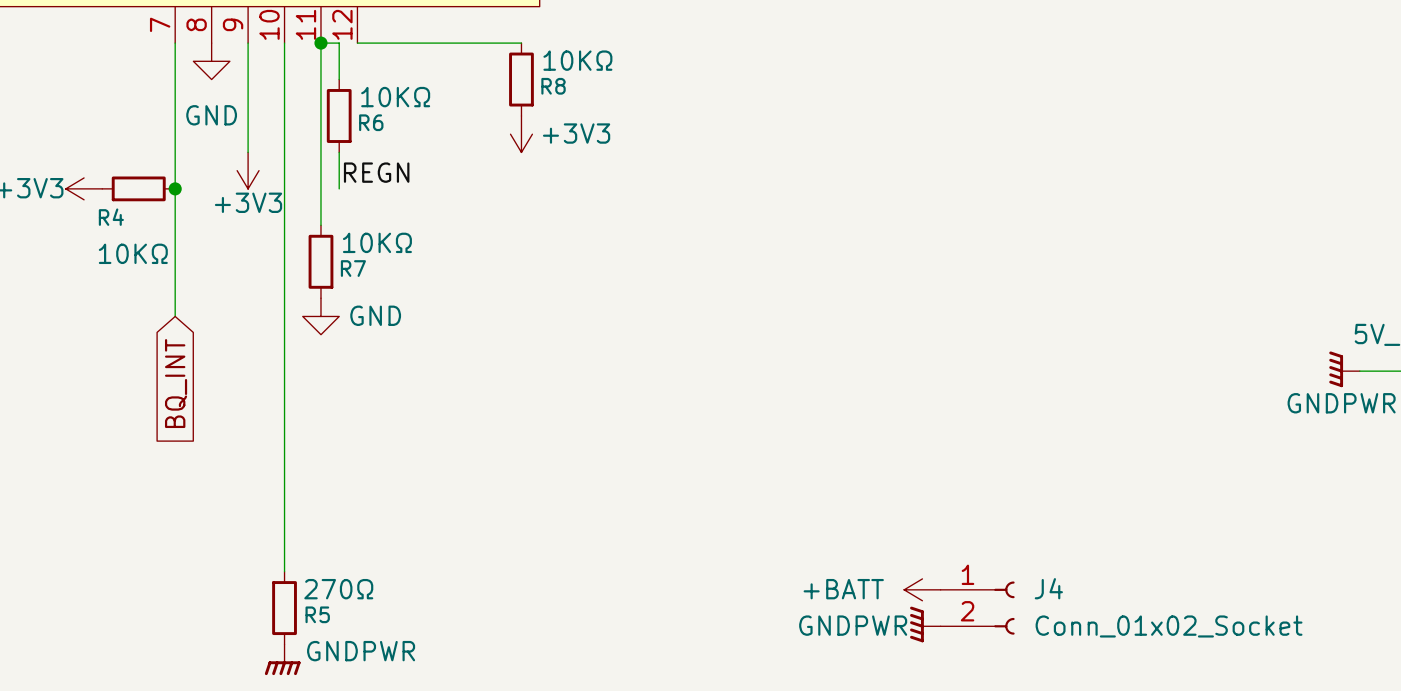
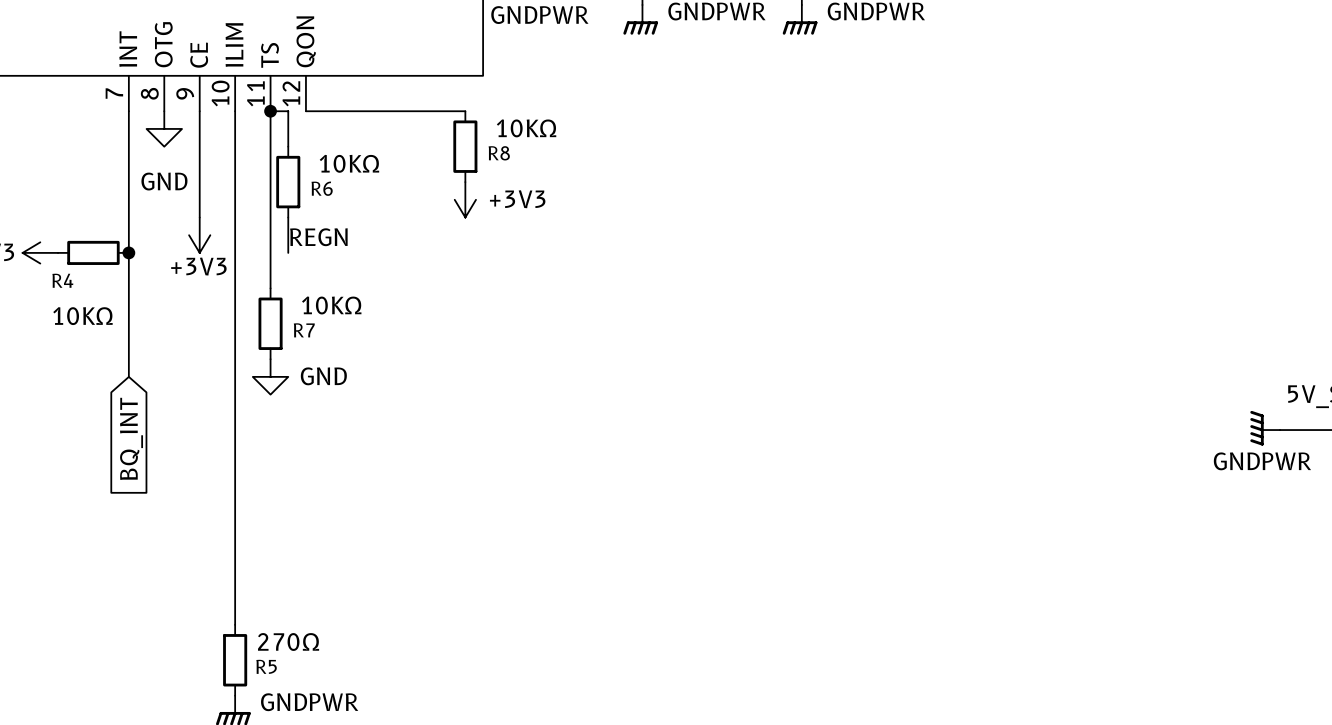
power symbol: +BATT (922, 589) -> none
J4: Conn_01x02_Socket (977, 608) -> none
power symbol: GNDPWR (925, 624) -> none

